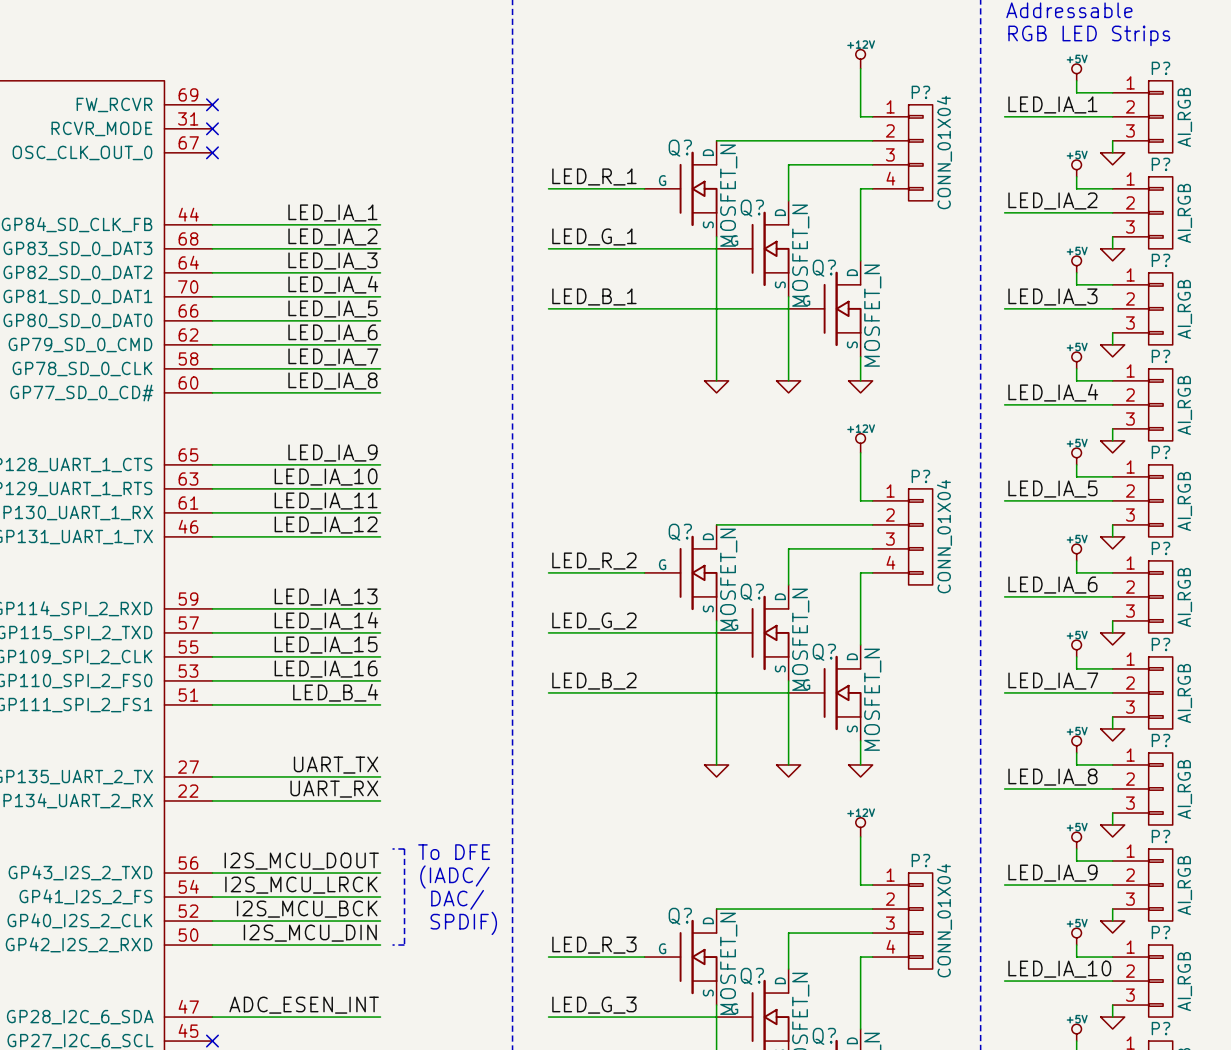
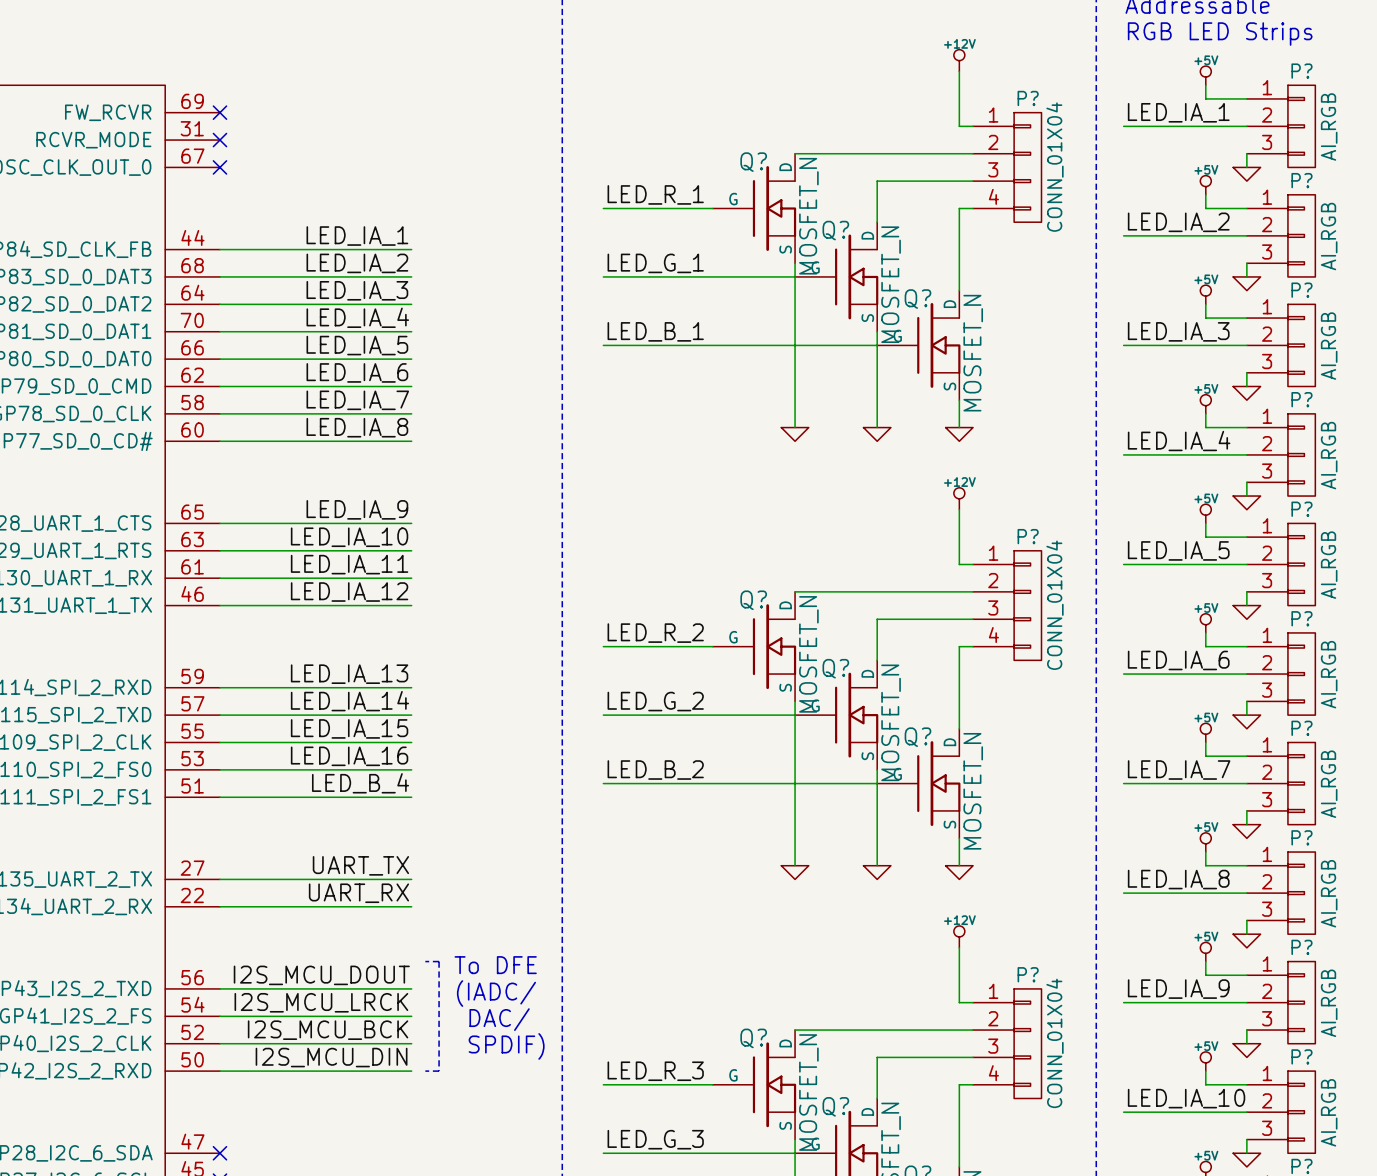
label: ADC_ESEN_INT (304, 1005) -> none
wire: (212, 1017) (380, 1017) -> none
no-connect mark: none -> (219, 1153)

